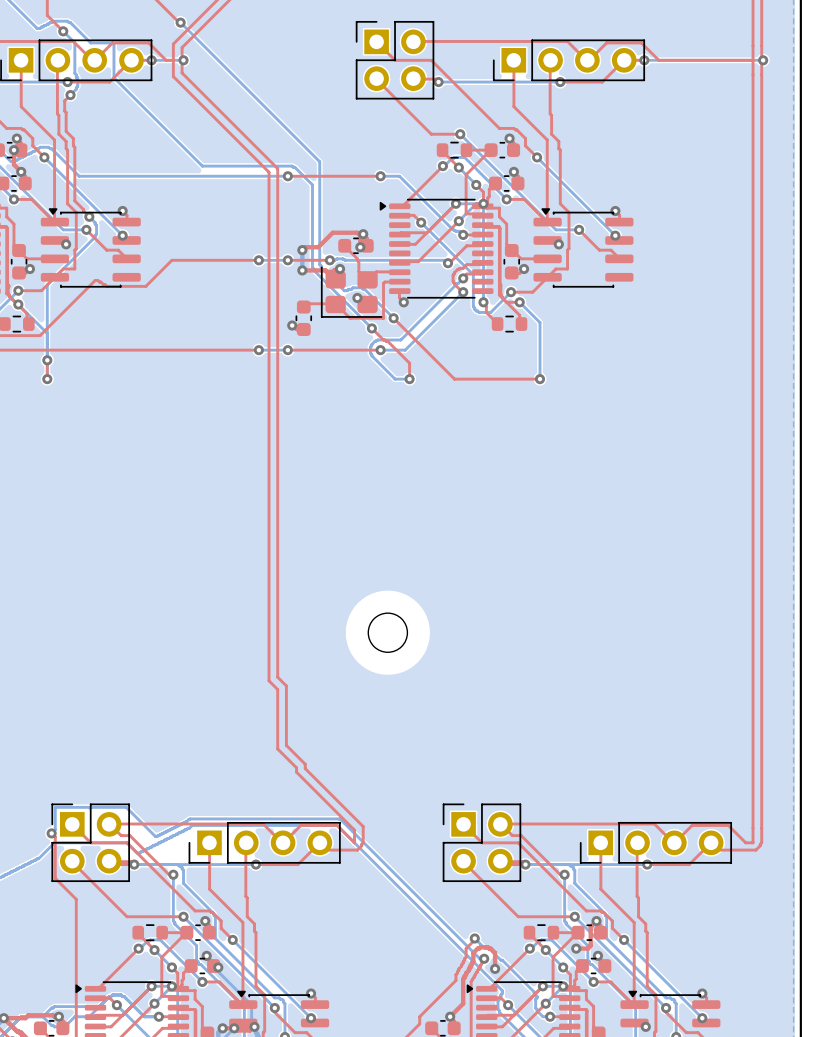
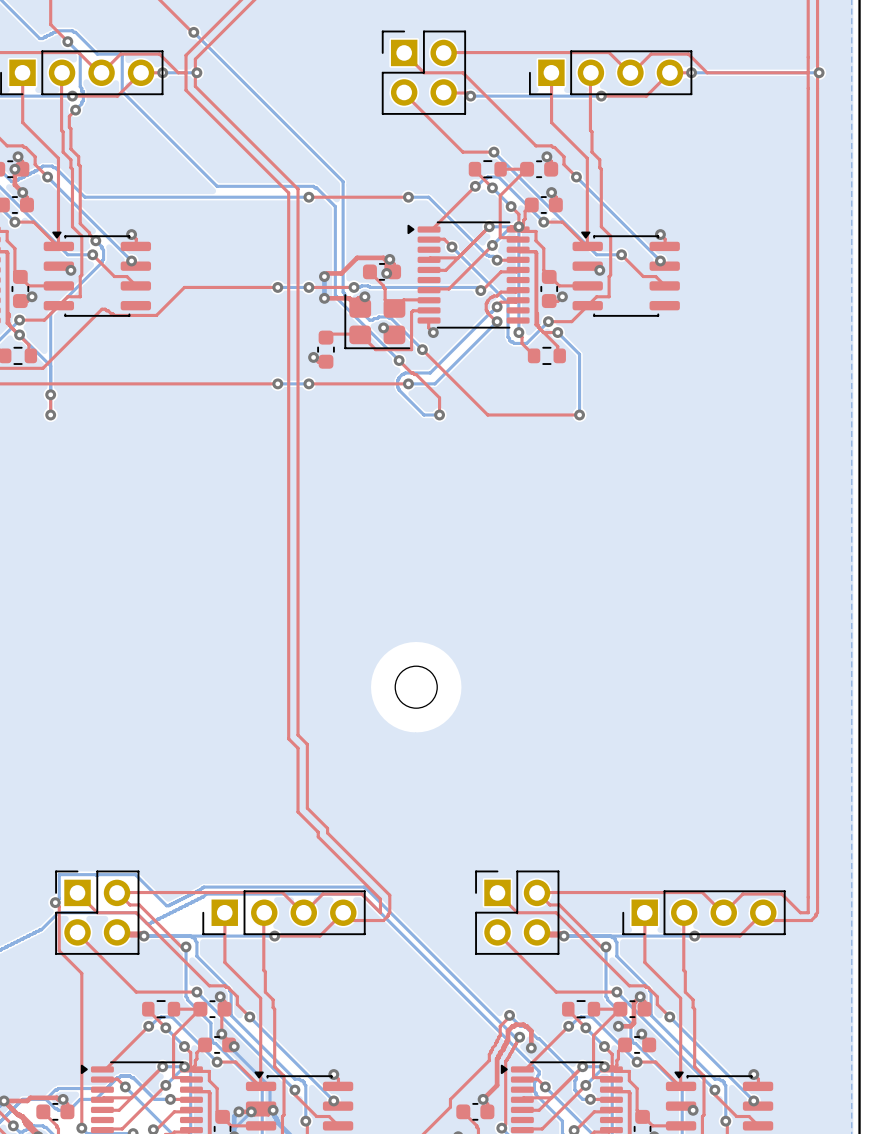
top track: none -> (224, 1009) (221, 1012) (221, 1034)

